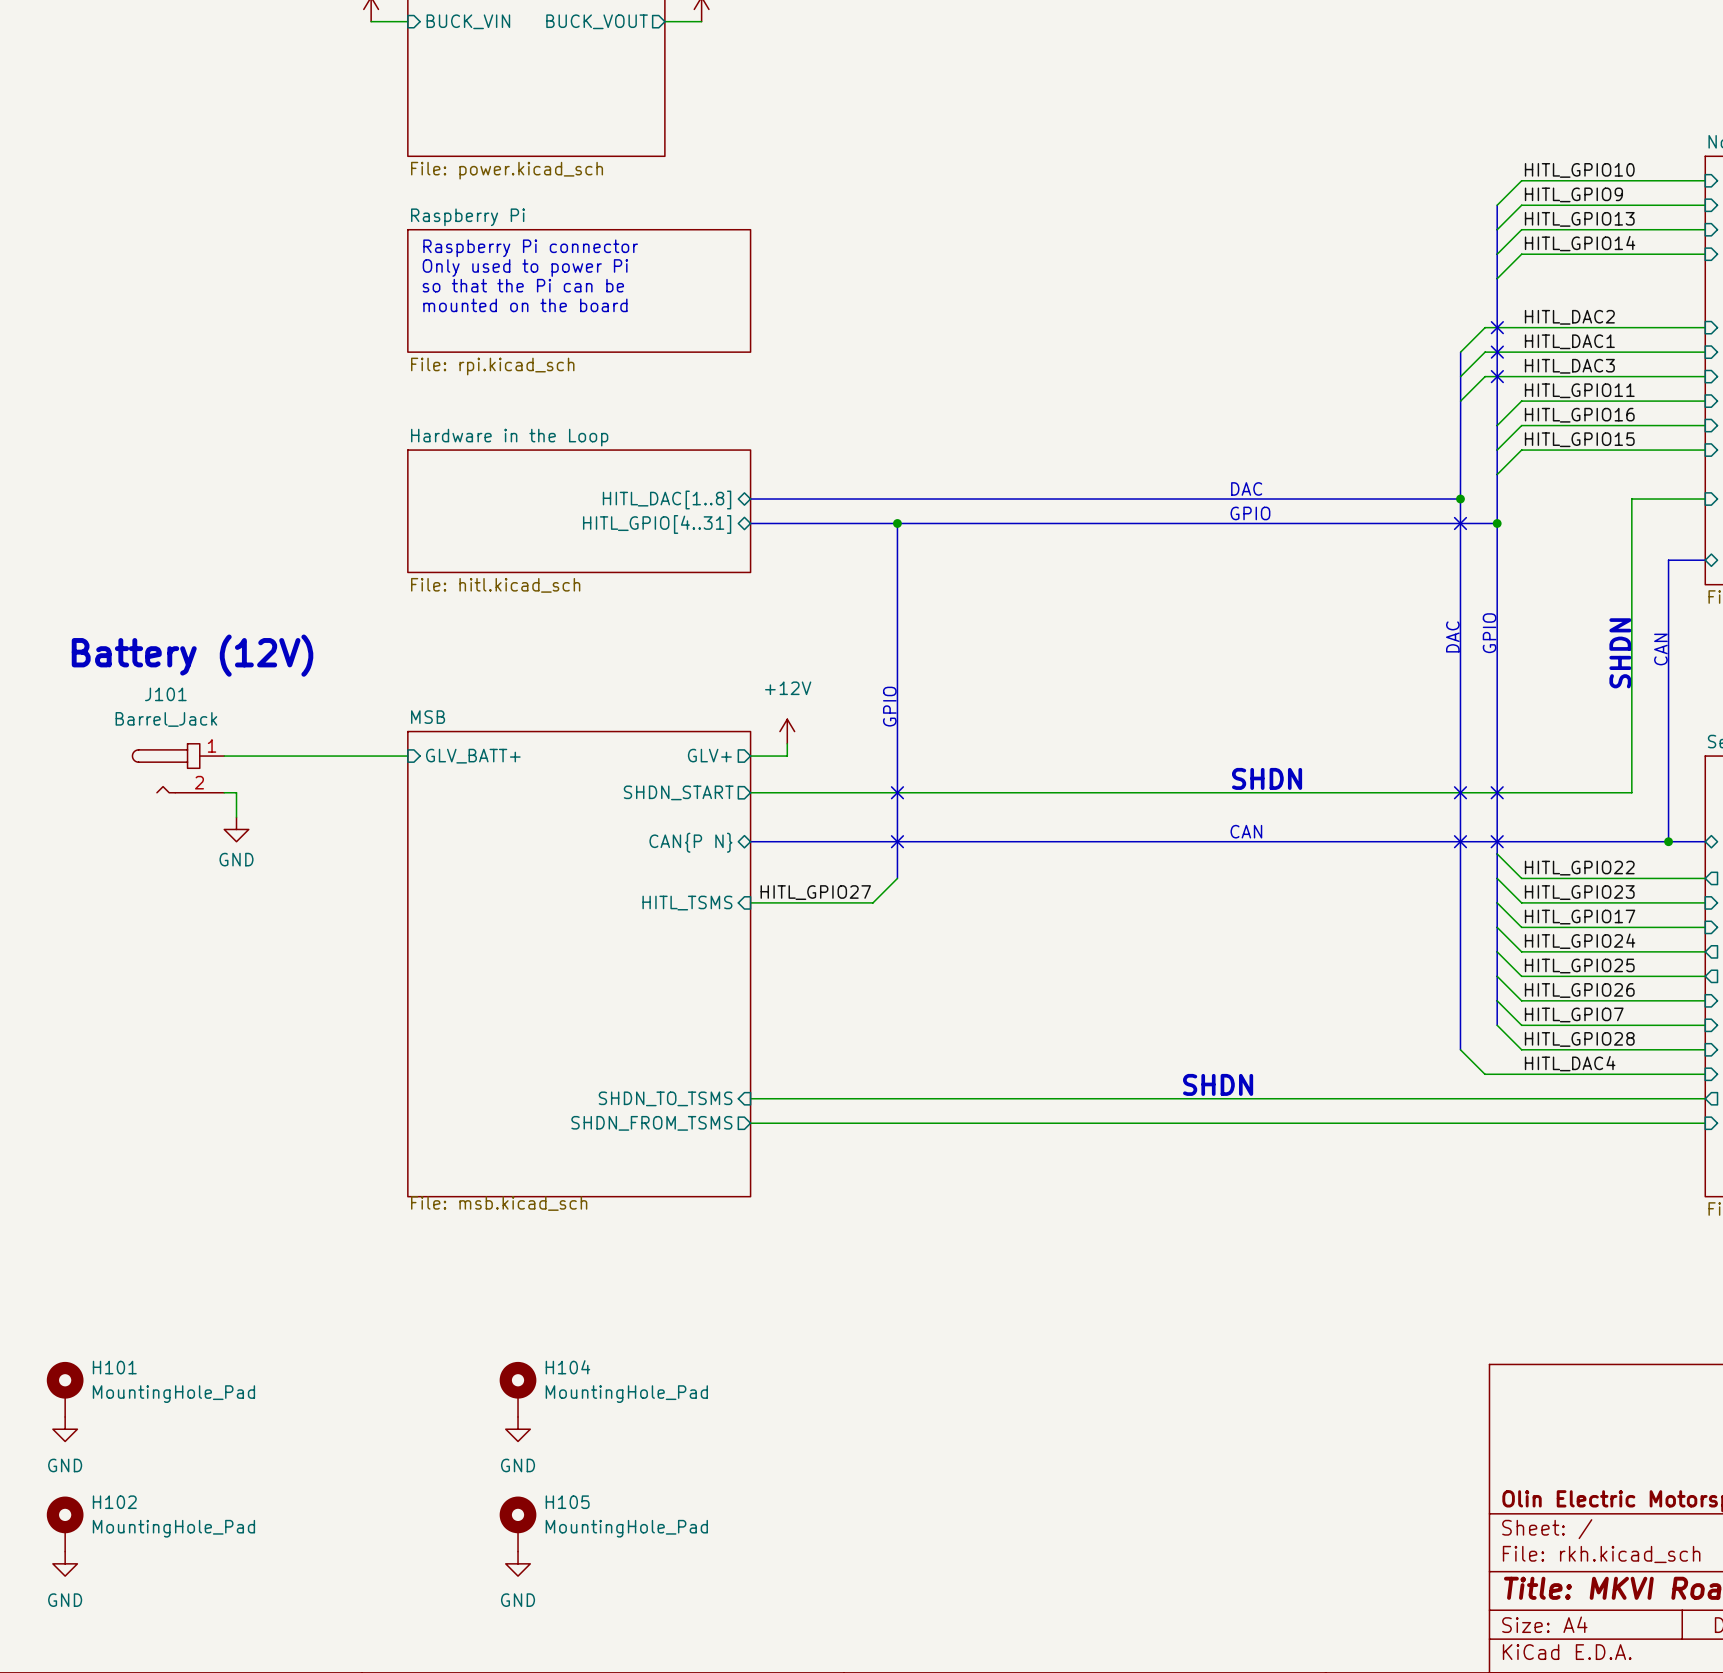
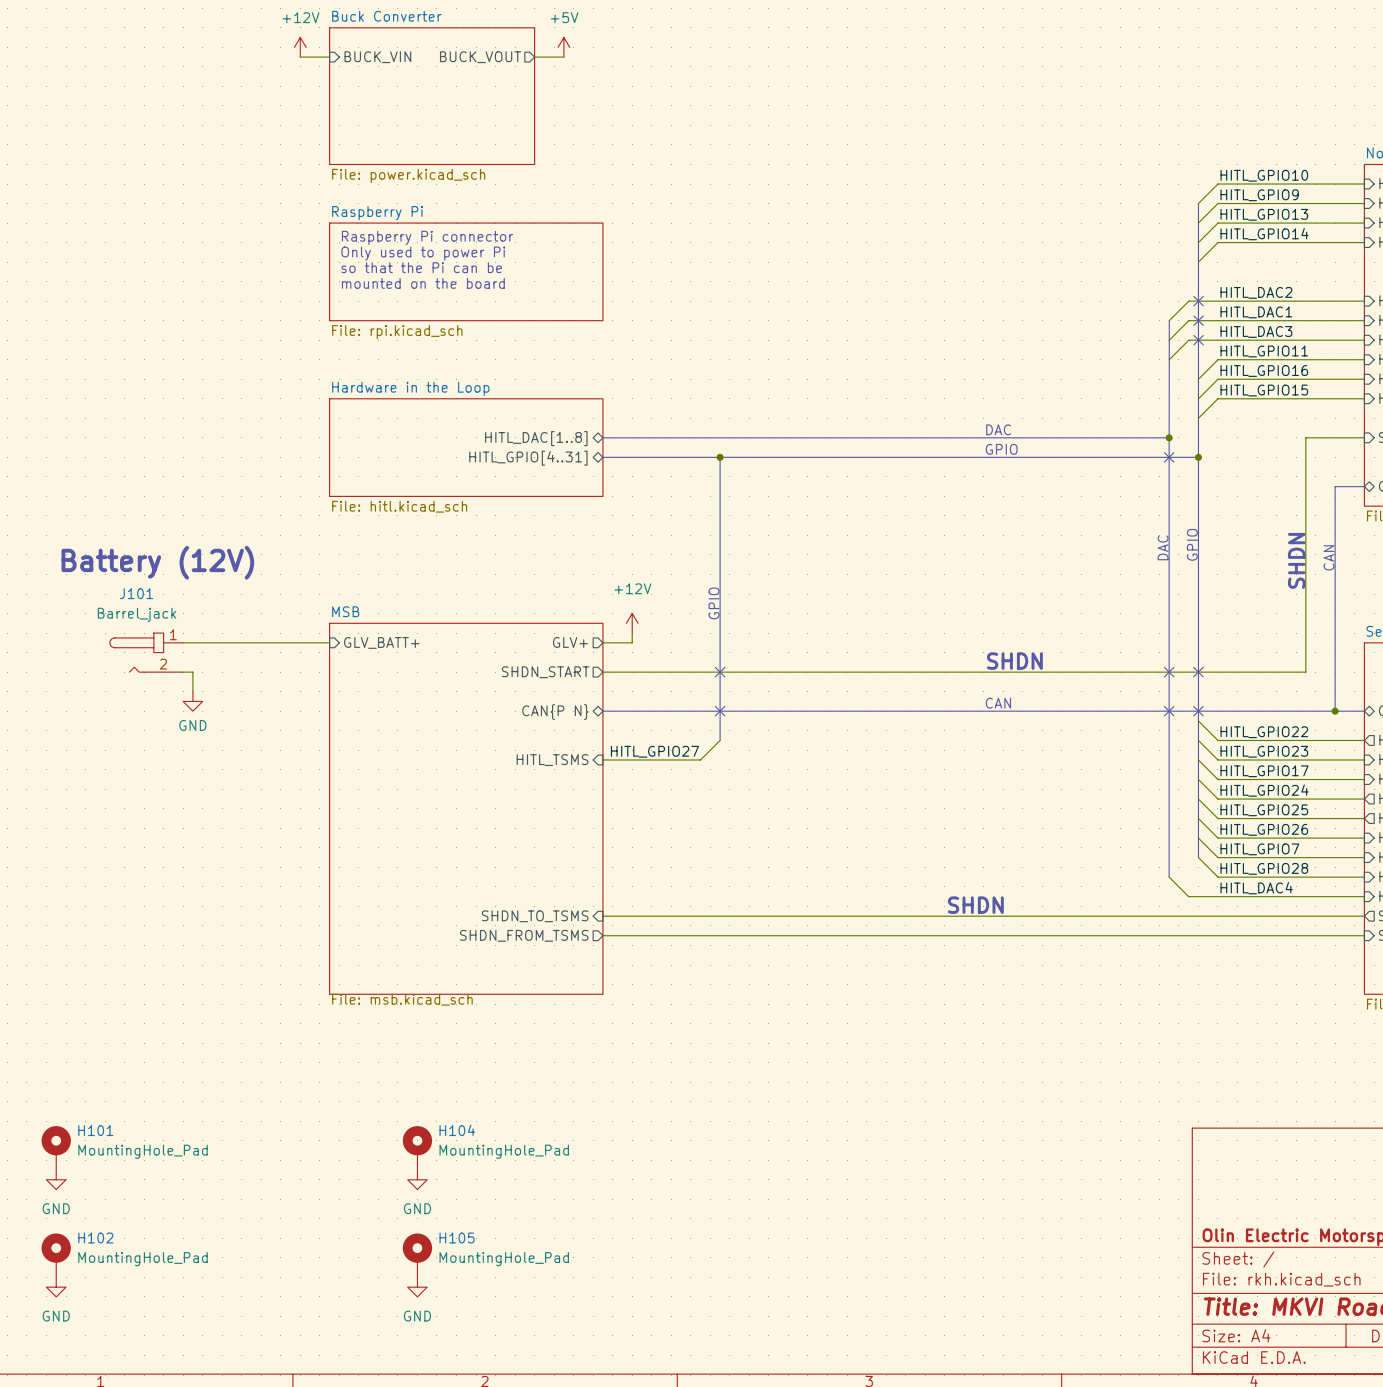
J101 value: Barrel_Jack (166, 719) -> Barrel_jack (137, 614)

